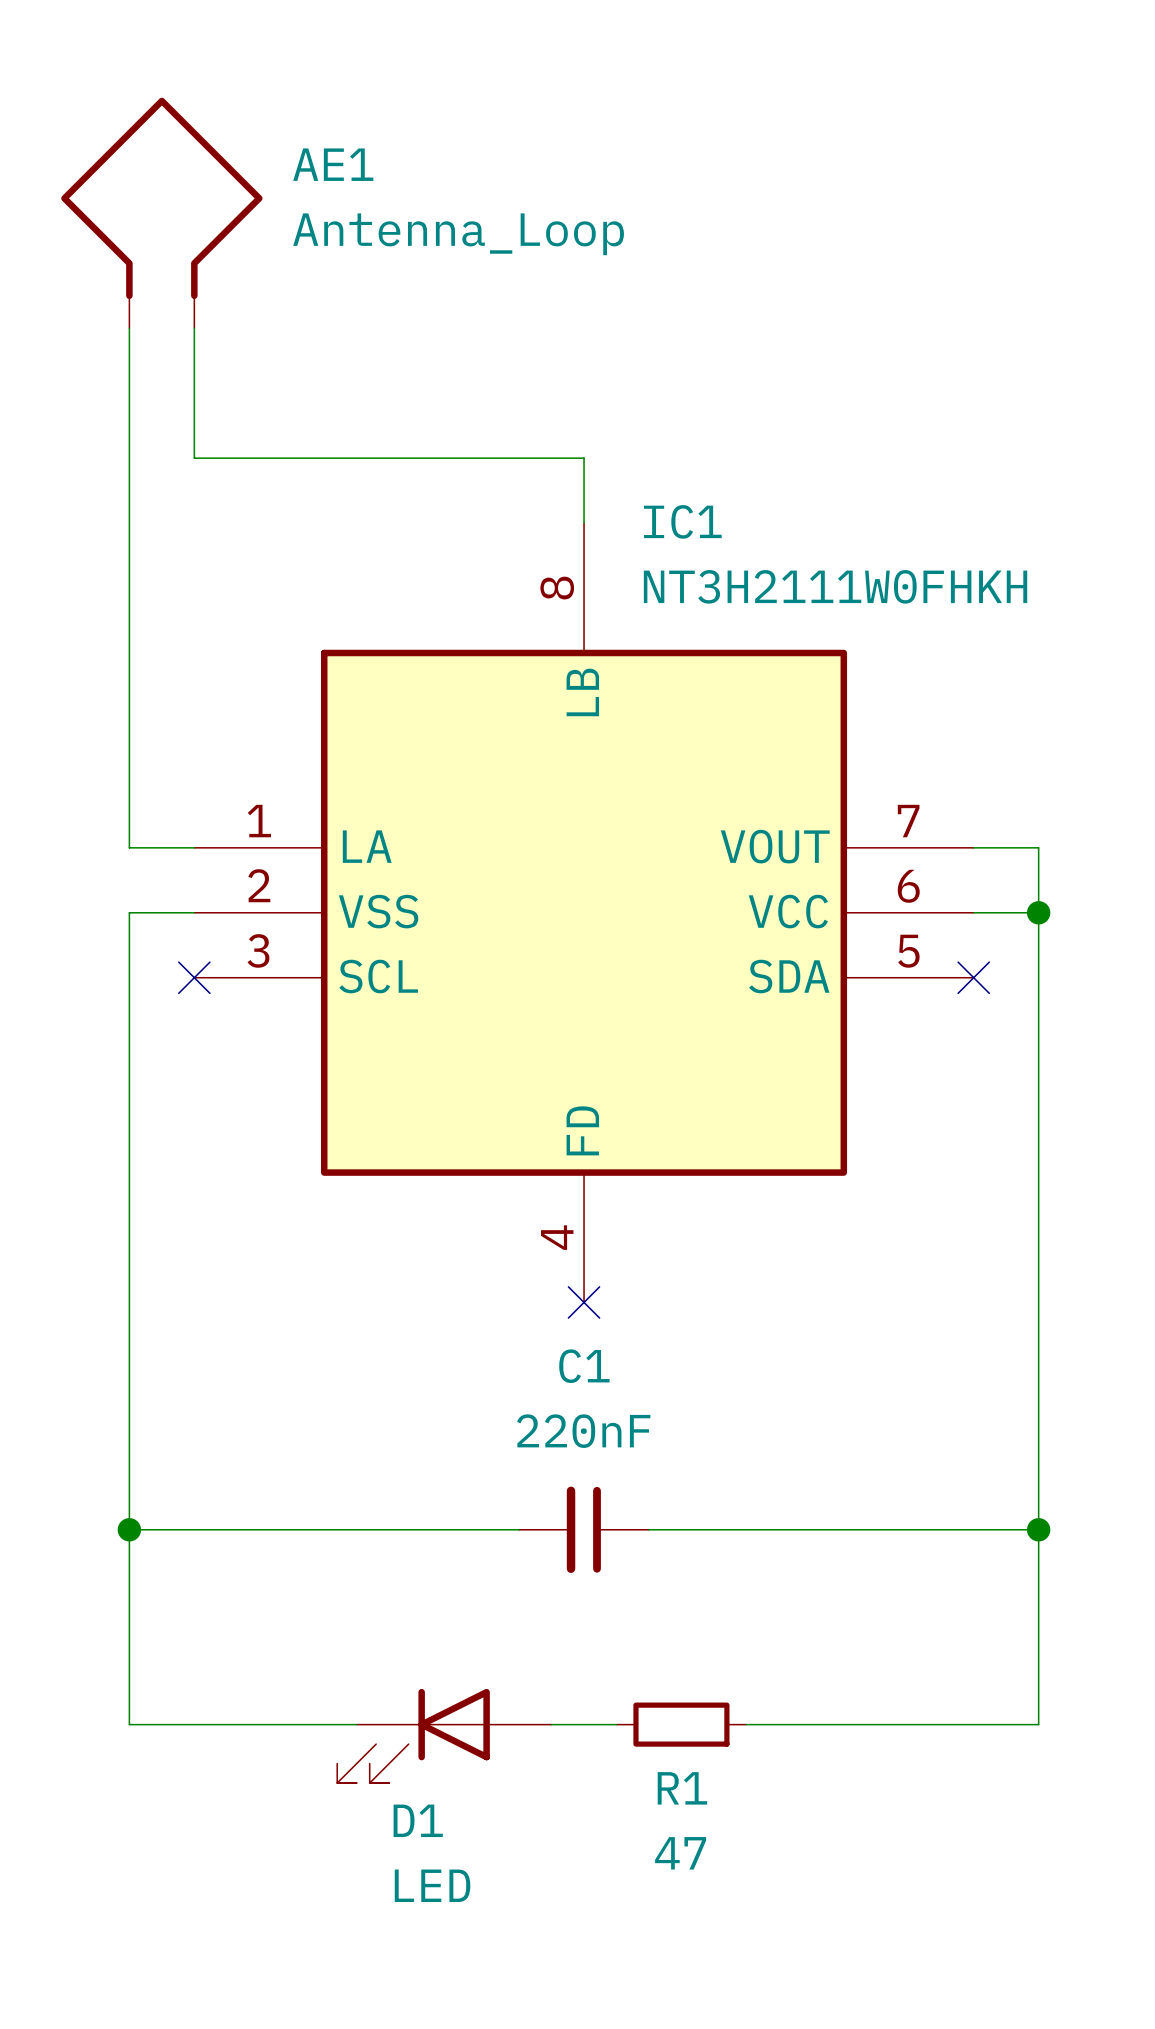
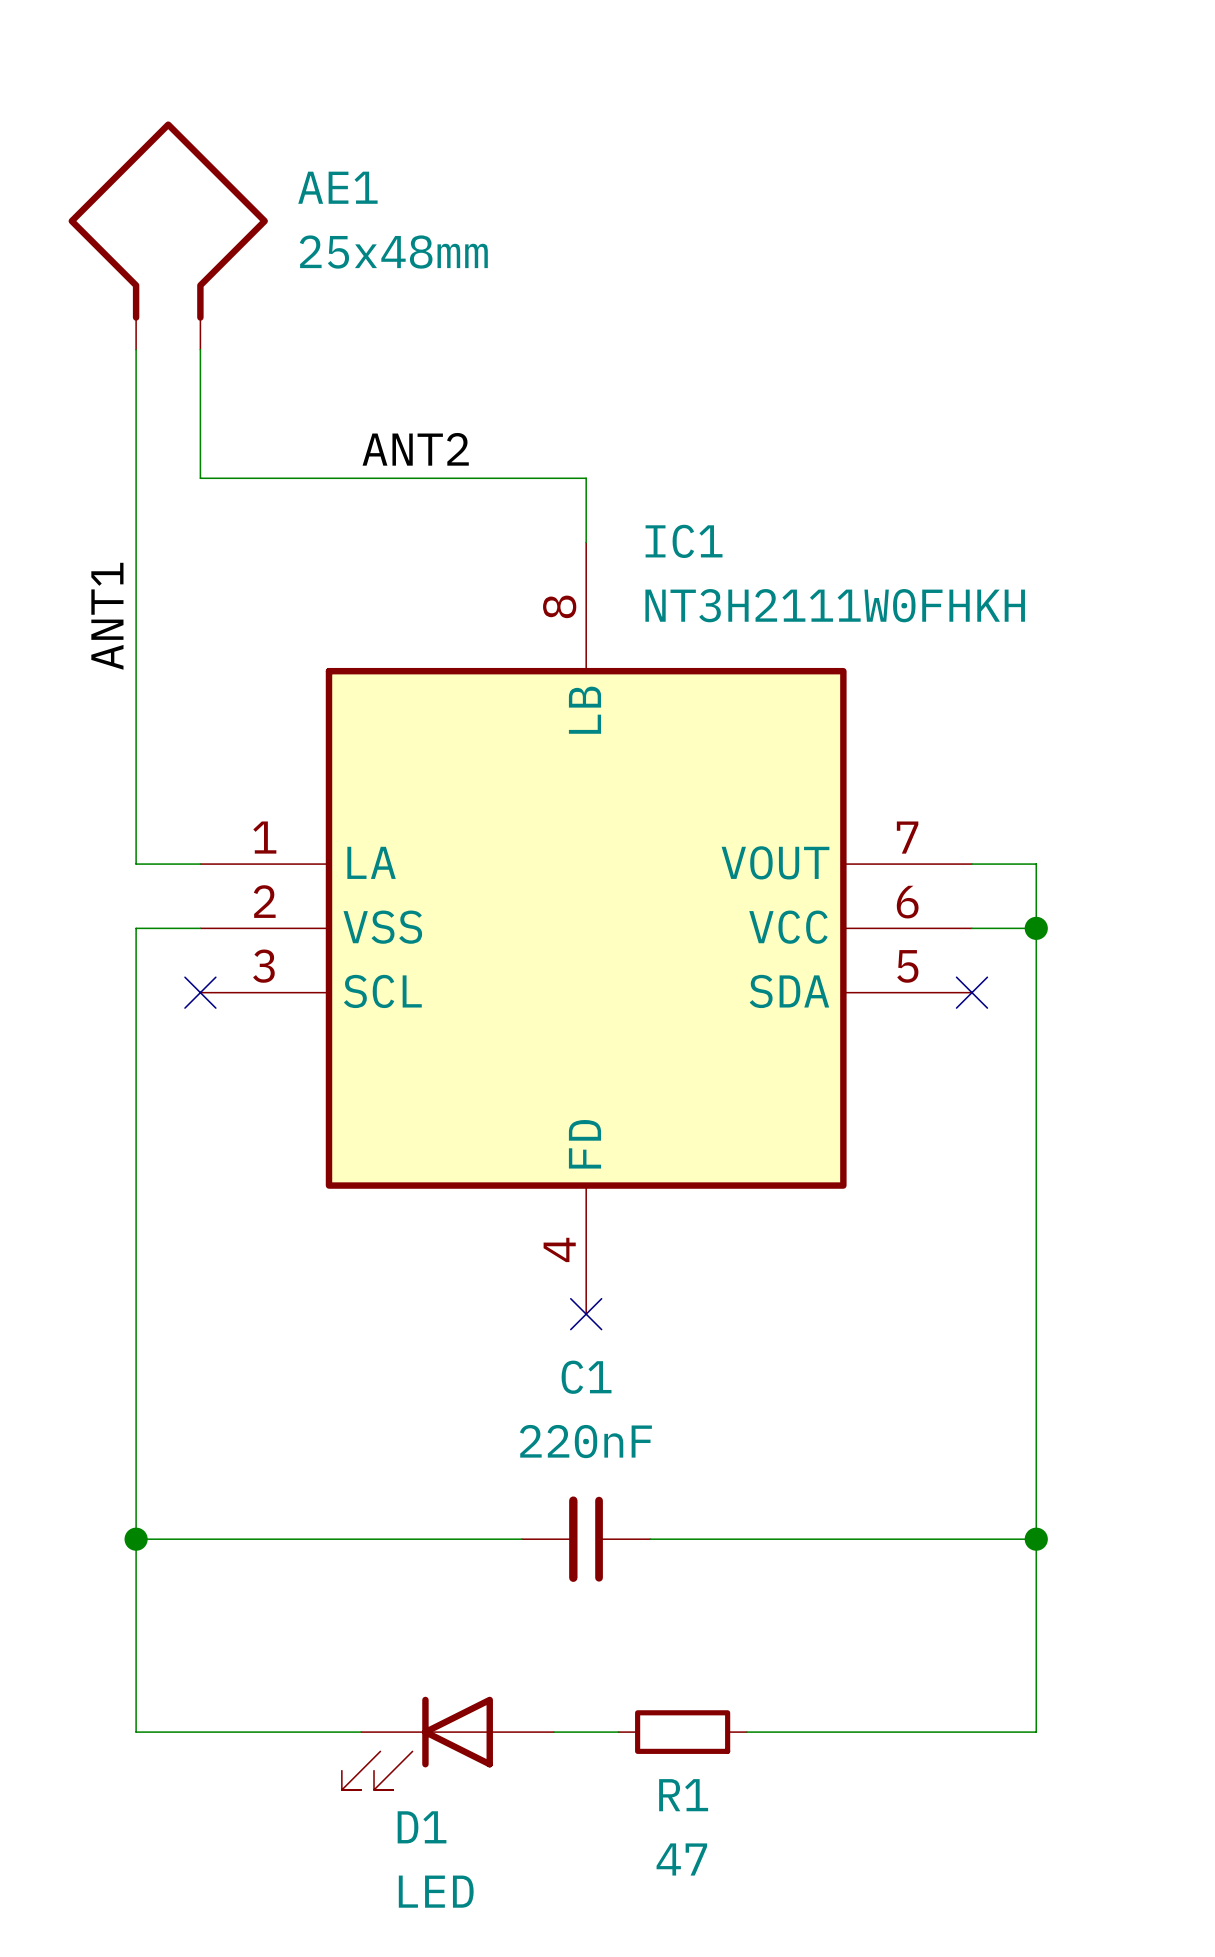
AE1 value: Antenna_Loop (458, 234) -> 25x48mm (393, 252)
label: none -> ANT2 (415, 449)
label: none -> ANT1 (107, 616)

